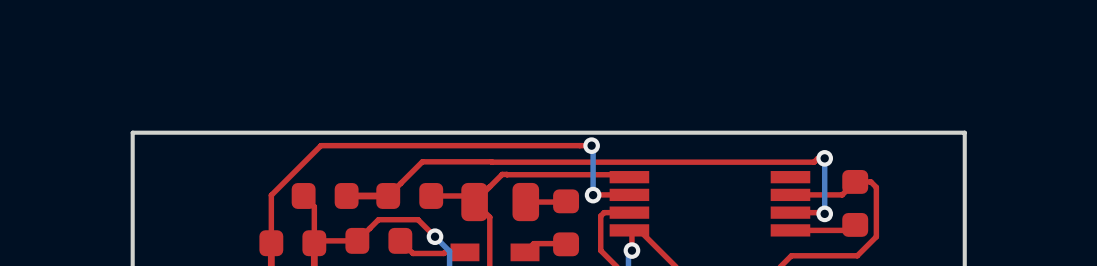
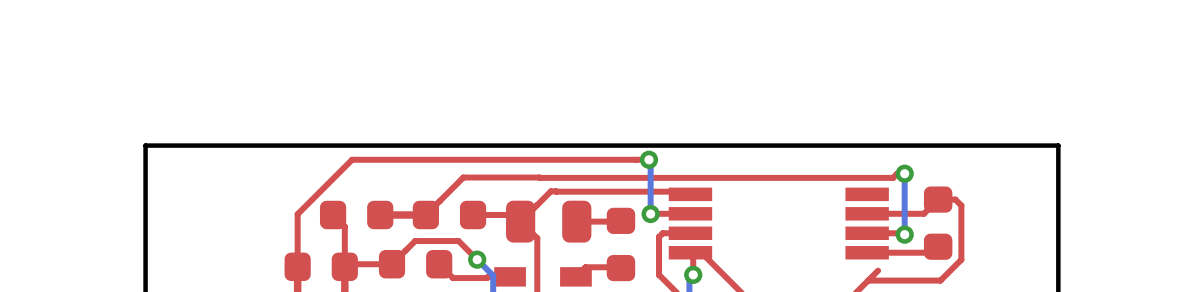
top track: none -> (878, 270) (868, 280)

